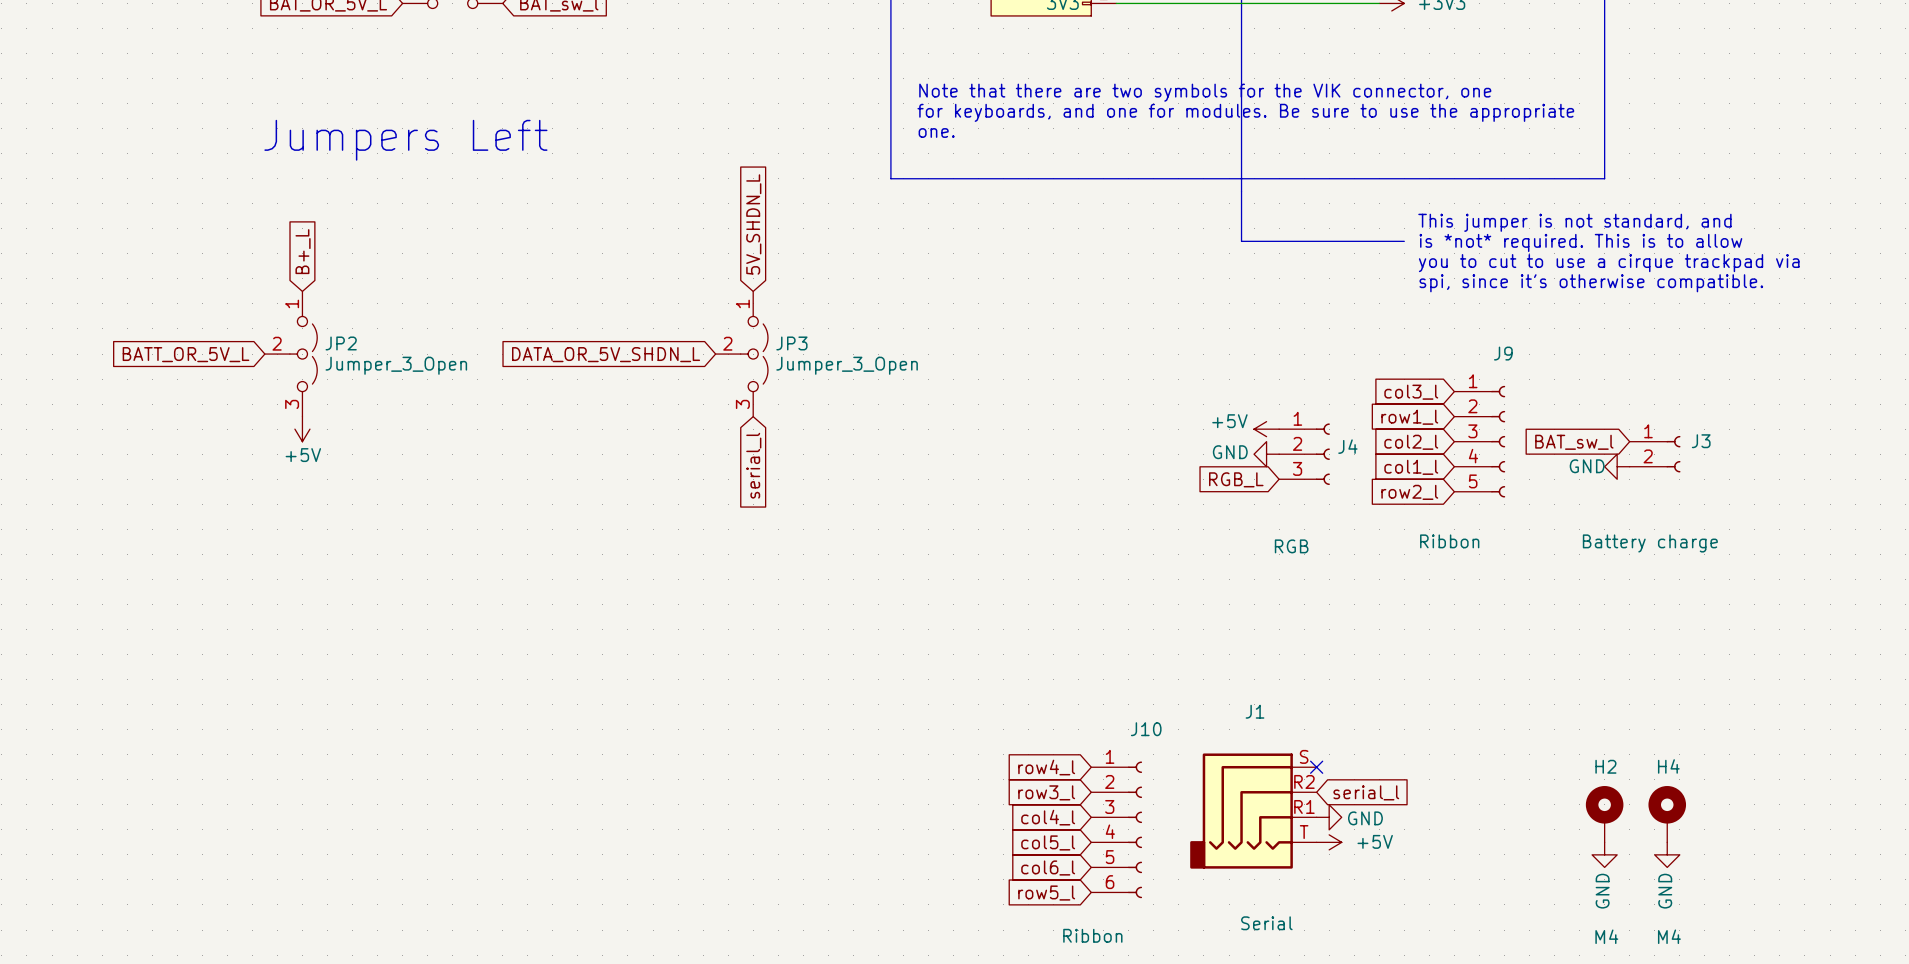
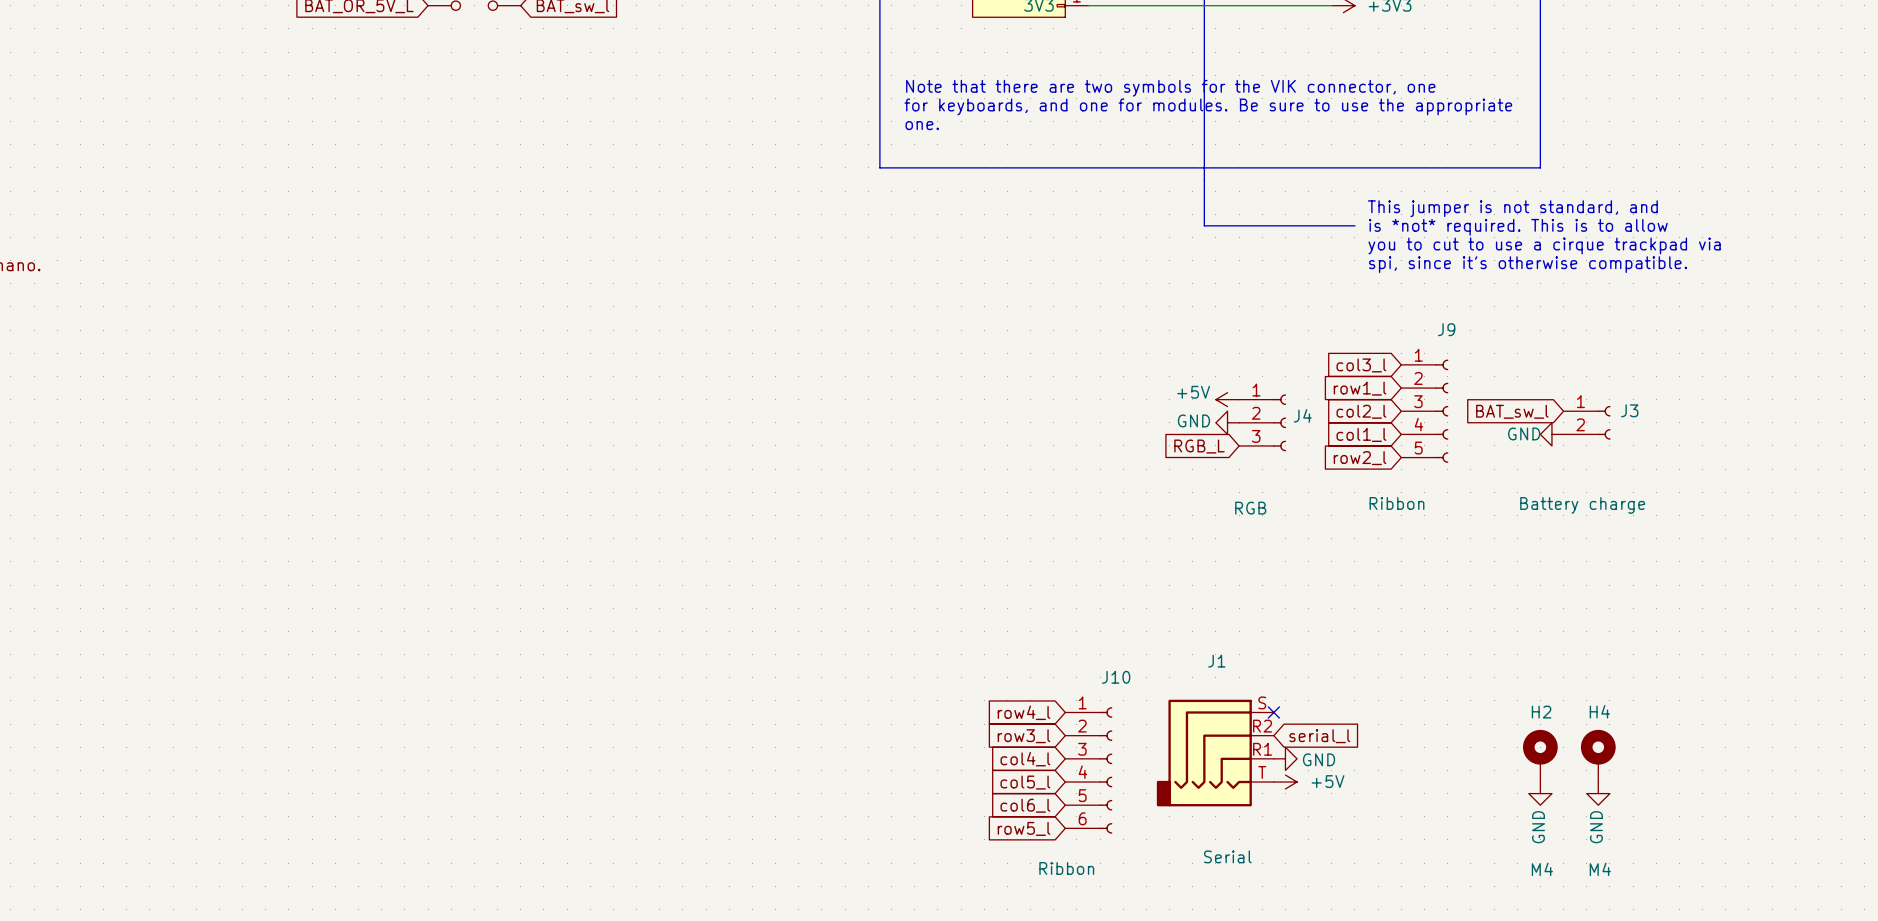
text: Jumpers Left (405, 140) -> none
global label: 5V_SHDN_L (753, 224) -> none
global label: B+_L (303, 251) -> none
global label: BATT_OR_5V_L (186, 354) -> none
JP2: Jumper_3_Open (291, 354) -> none
global label: DATA_OR_5V_SHDN_L (606, 354) -> none
JP3: Jumper_3_Open (741, 354) -> none
power symbol: +5V (302, 429) -> none
global label: serial_l (753, 465) -> none

